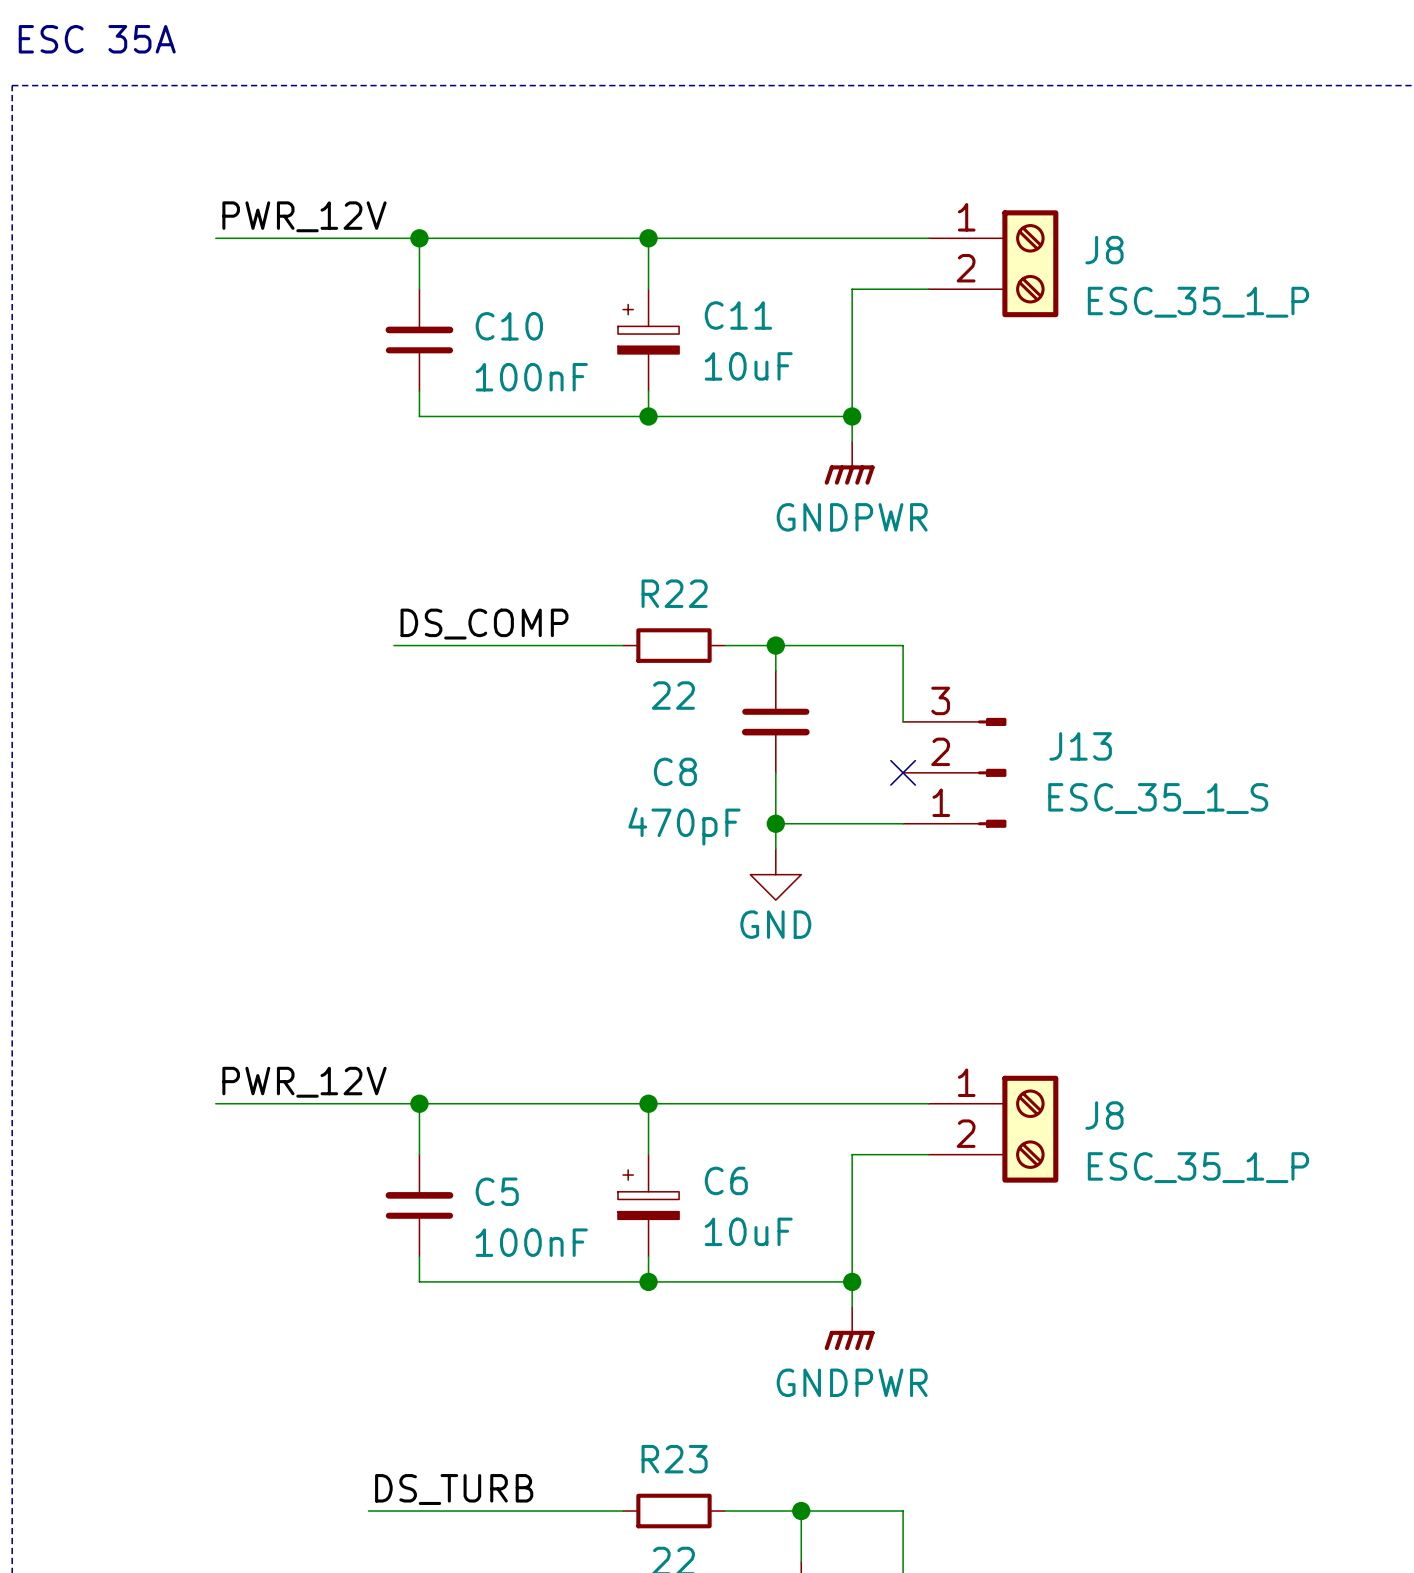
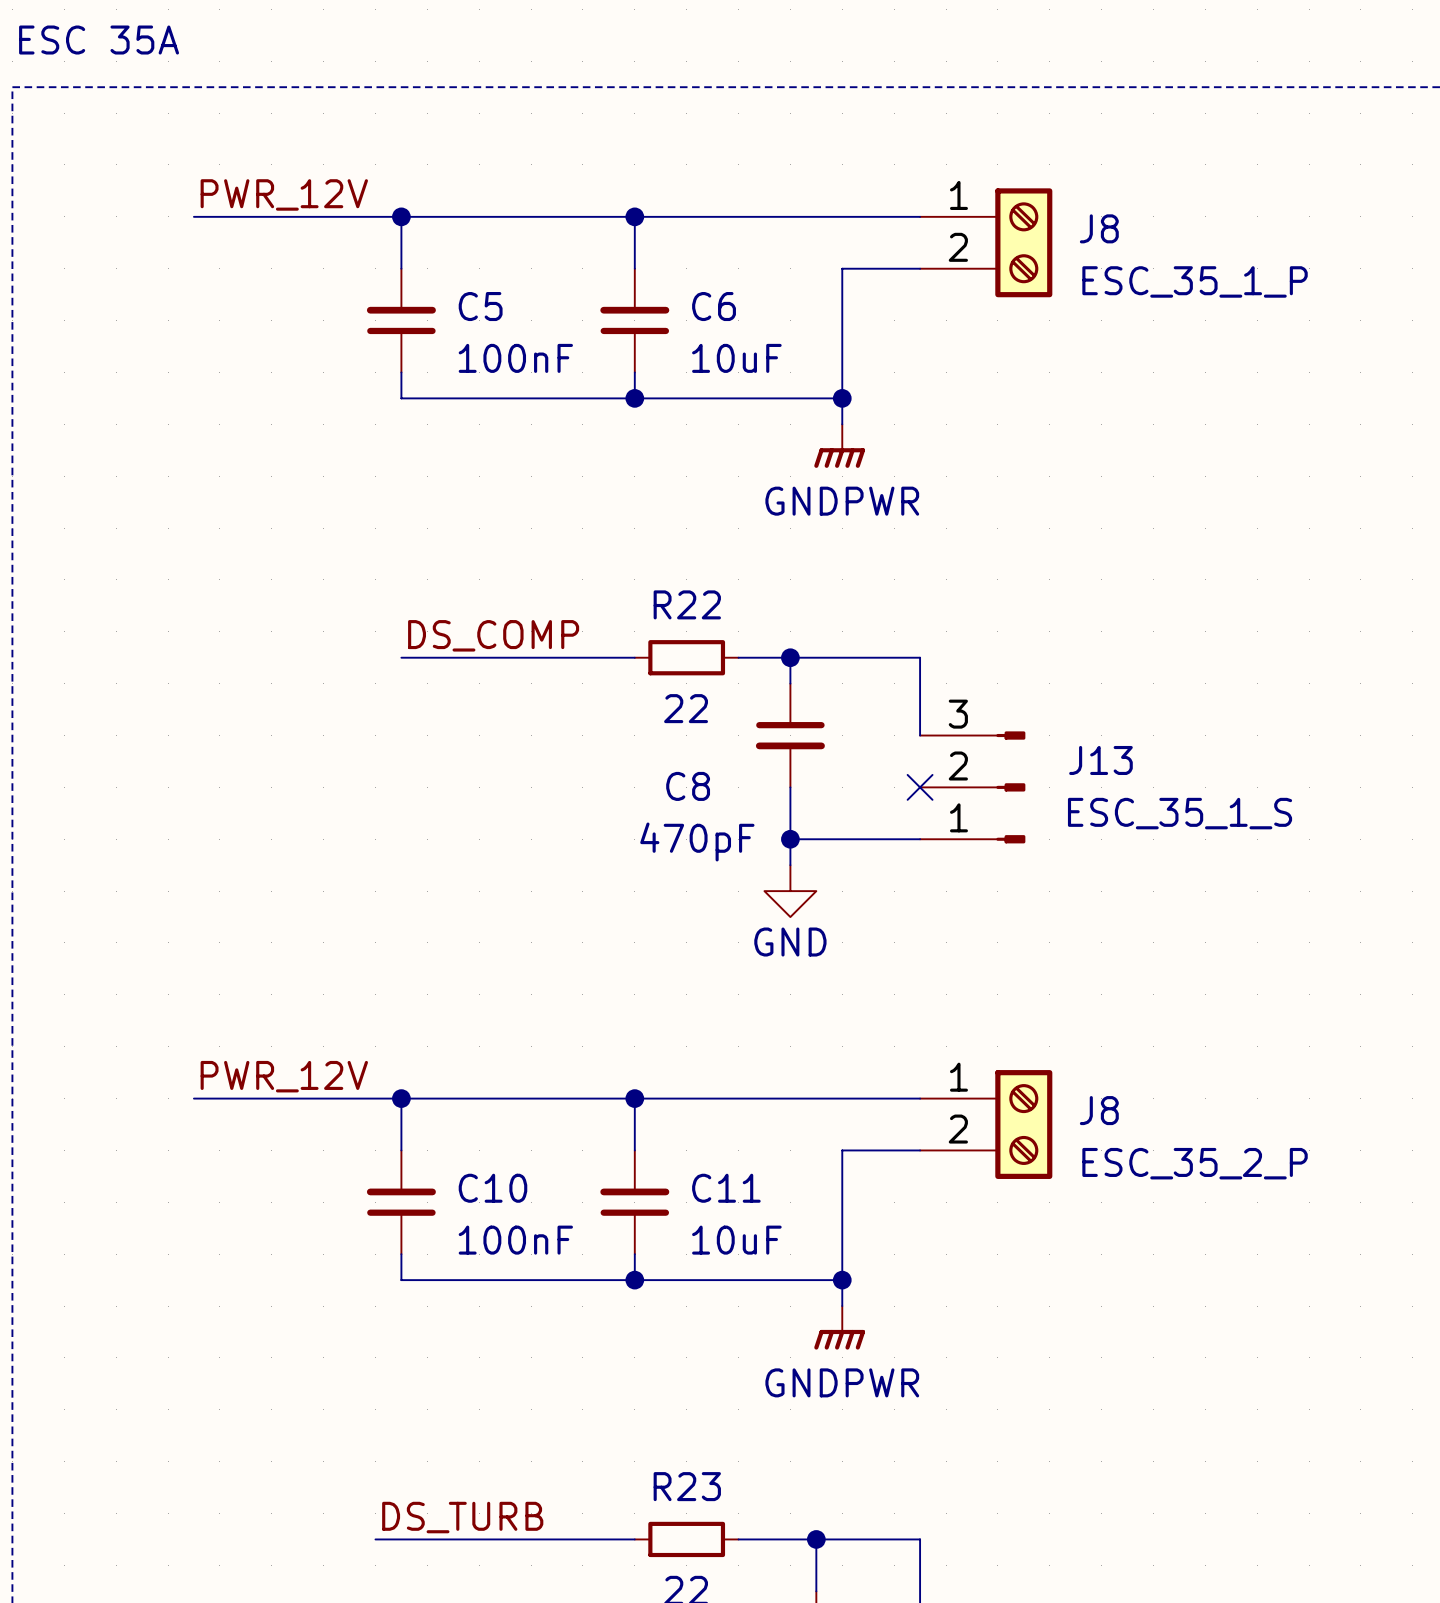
label position: PWR_12V (304, 216) -> PWR_12V (284, 194)
wire: (215, 238) (928, 238) -> (193, 216) (920, 216)
wire: (419, 238) (419, 289) -> (401, 216) (401, 268)
junction position: (419, 238) -> (401, 216)
wire: (648, 238) (648, 289) -> (634, 216) (634, 268)
junction position: (648, 238) -> (634, 216)
J8 position: (993, 263) -> (986, 242)
C11 symbol: [617, 289, 680, 392] -> [600, 1150, 670, 1255]
wire: (928, 289) (852, 289) (852, 441) -> (920, 268) (842, 268) (842, 424)
C10 position: (419, 340) -> (401, 1202)
wire: (419, 391) (419, 416) (852, 416) -> (401, 372) (401, 398) (842, 398)
wire: (648, 391) (648, 416) -> (634, 372) (634, 398)
junction position: (648, 416) -> (634, 398)
junction position: (852, 416) -> (842, 398)
power symbol position: GNDPWR (849, 463) -> GNDPWR (839, 446)
label position: PWR_12V (304, 1082) -> PWR_12V (284, 1076)
wire: (215, 1103) (928, 1103) -> (193, 1098) (920, 1098)
wire: (419, 1103) (419, 1154) -> (401, 1098) (401, 1150)
junction position: (419, 1103) -> (401, 1098)
wire: (648, 1103) (648, 1154) -> (634, 1098) (634, 1150)
junction position: (648, 1103) -> (634, 1098)
J8: none -> ESC_35_2_P (986, 1124)
J8: ESC_35_1_P (993, 1129) -> none
C6 symbol: [617, 1154, 680, 1257] -> [600, 268, 670, 373]
wire: (928, 1154) (852, 1154) (852, 1307) -> (920, 1150) (842, 1150) (842, 1306)
C5 position: (419, 1205) -> (401, 320)
wire: (419, 1256) (419, 1281) (852, 1281) -> (401, 1254) (401, 1280) (842, 1280)
wire: (648, 1256) (648, 1281) -> (634, 1254) (634, 1280)
junction position: (648, 1281) -> (634, 1280)
junction position: (852, 1281) -> (842, 1280)
power symbol position: GNDPWR (849, 1328) -> GNDPWR (839, 1327)

